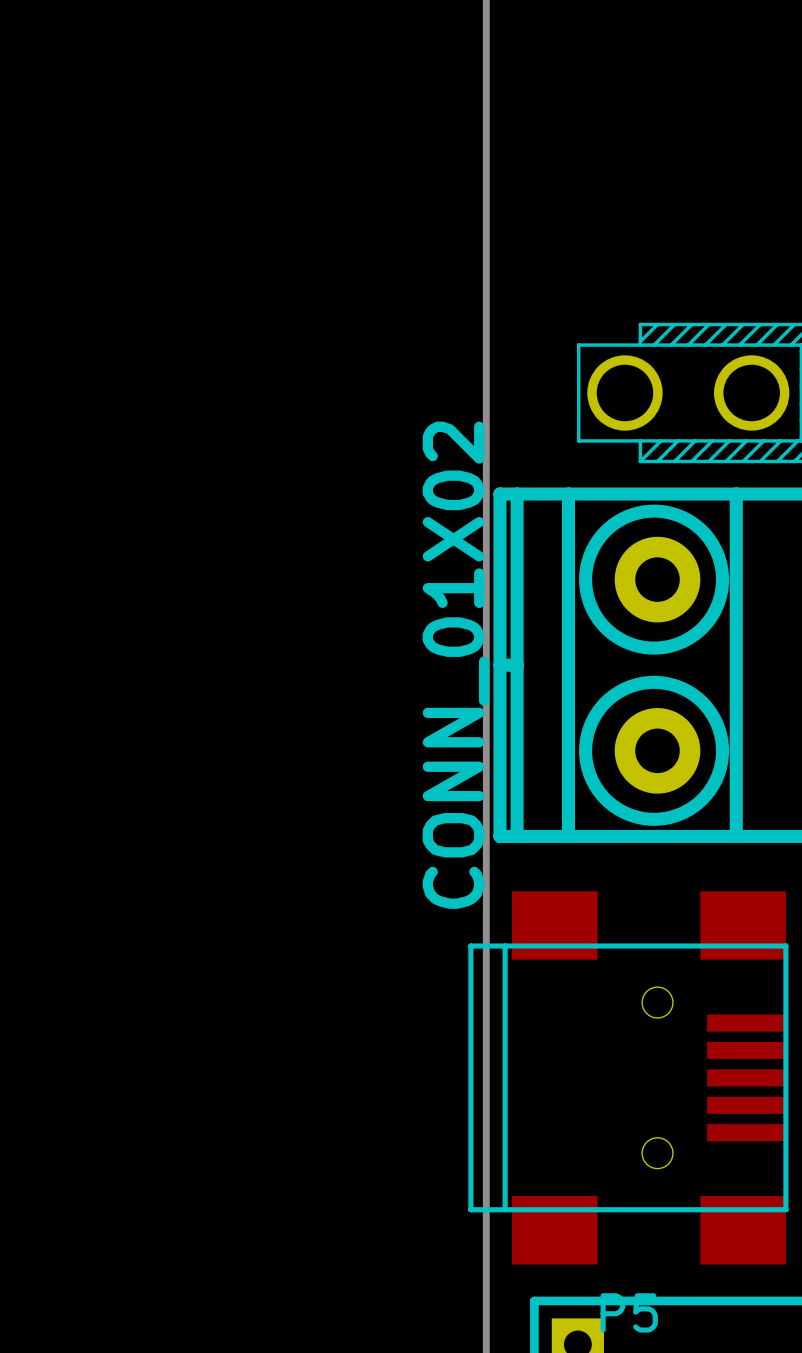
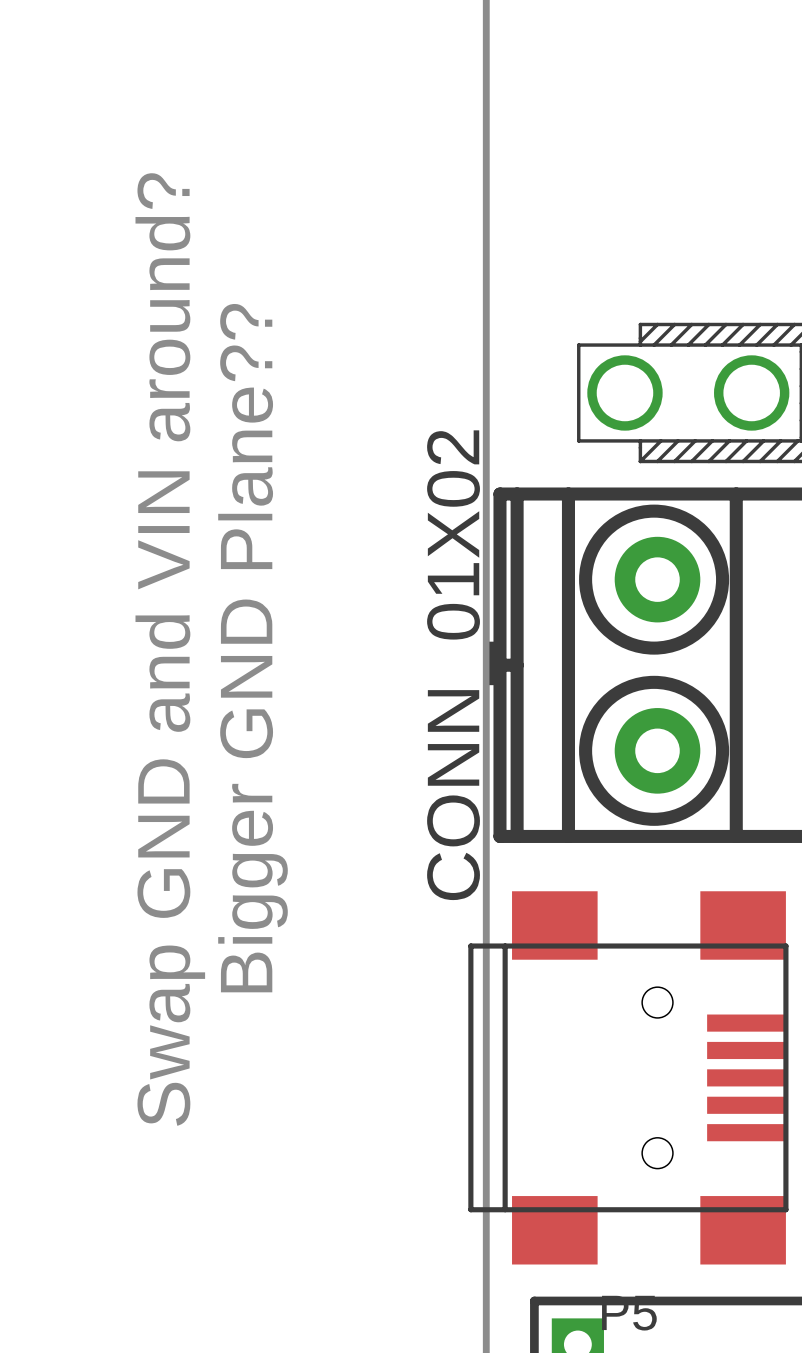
text: none -> Bigger GND Plane?? (253, 648)
text: none -> Swap GND and VIN around? (170, 649)

